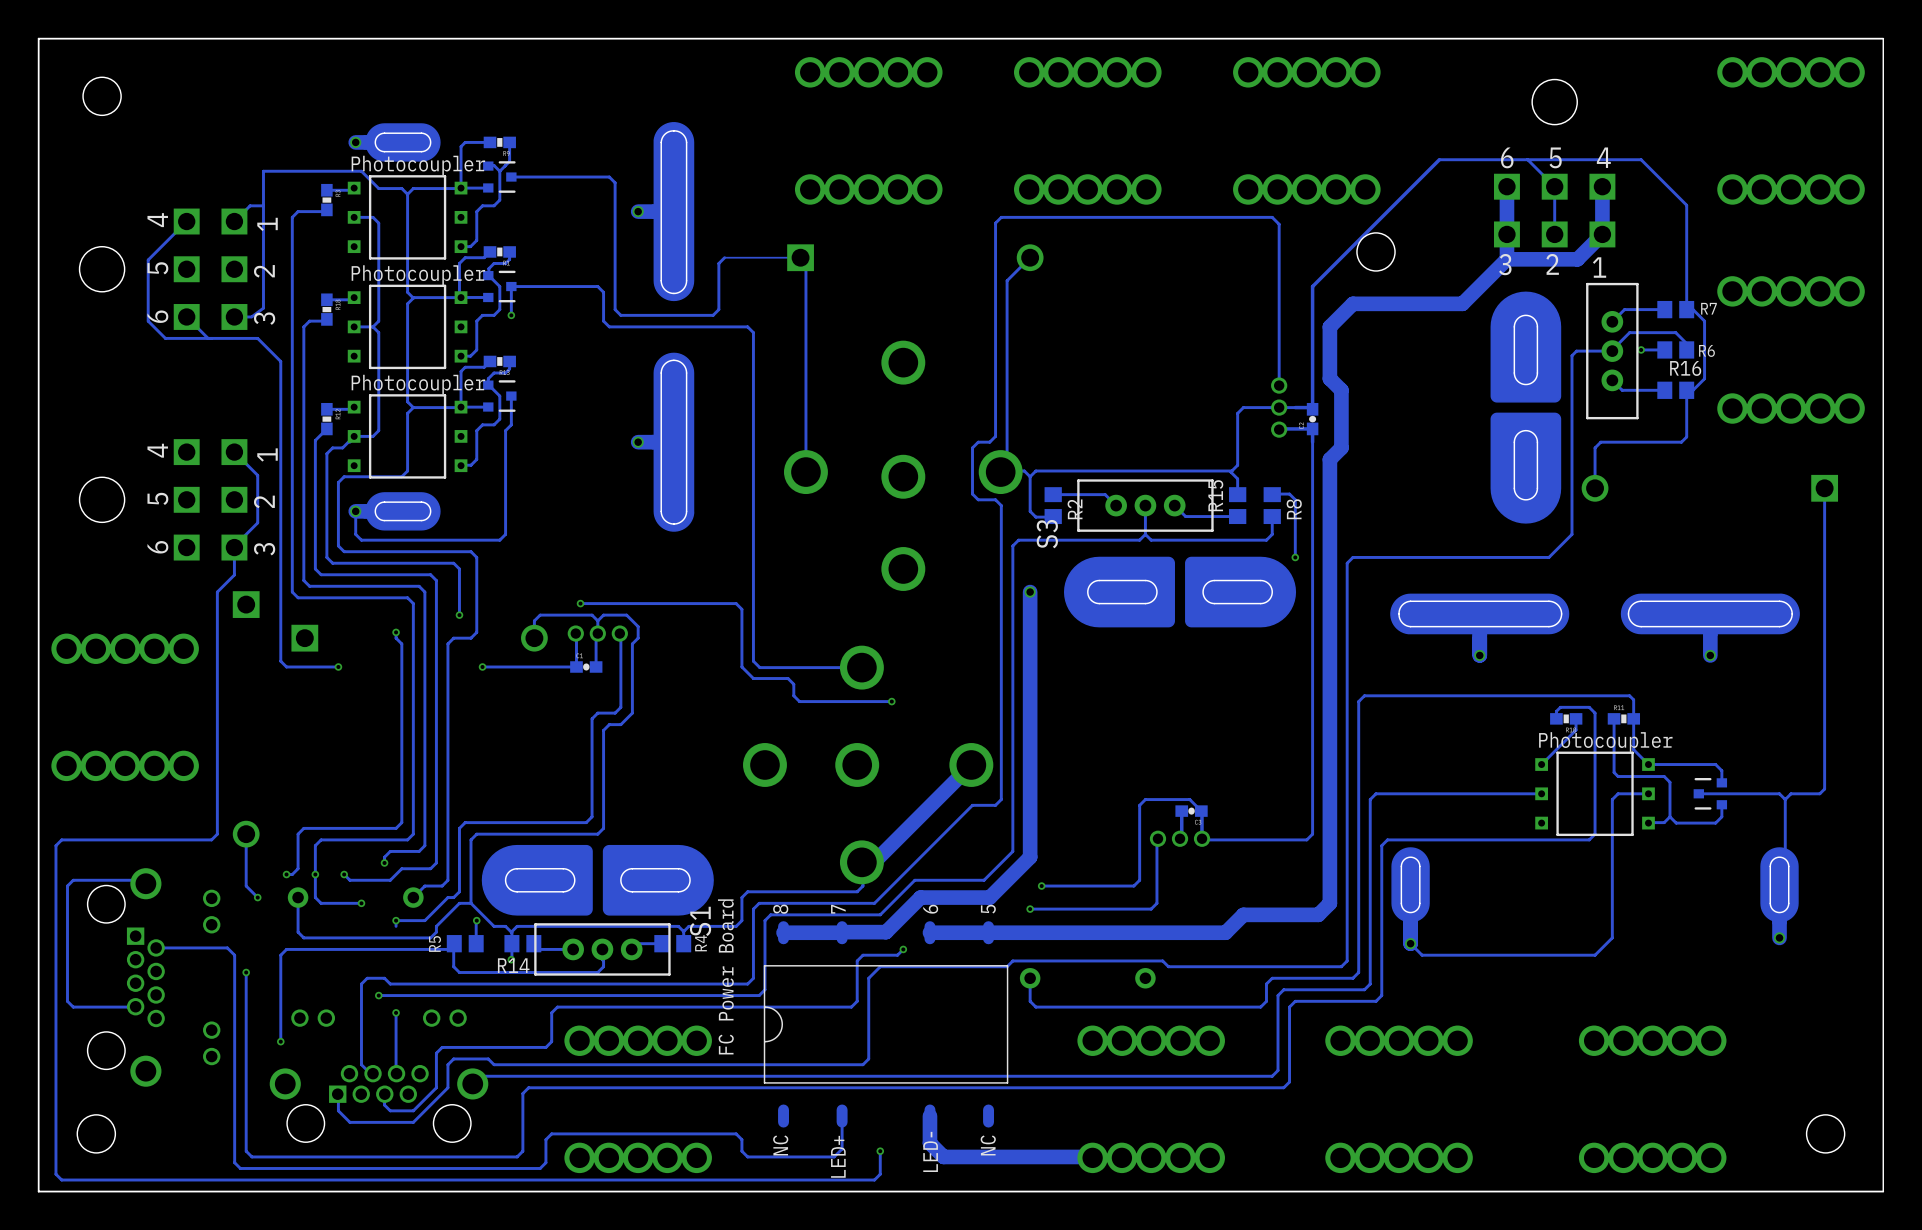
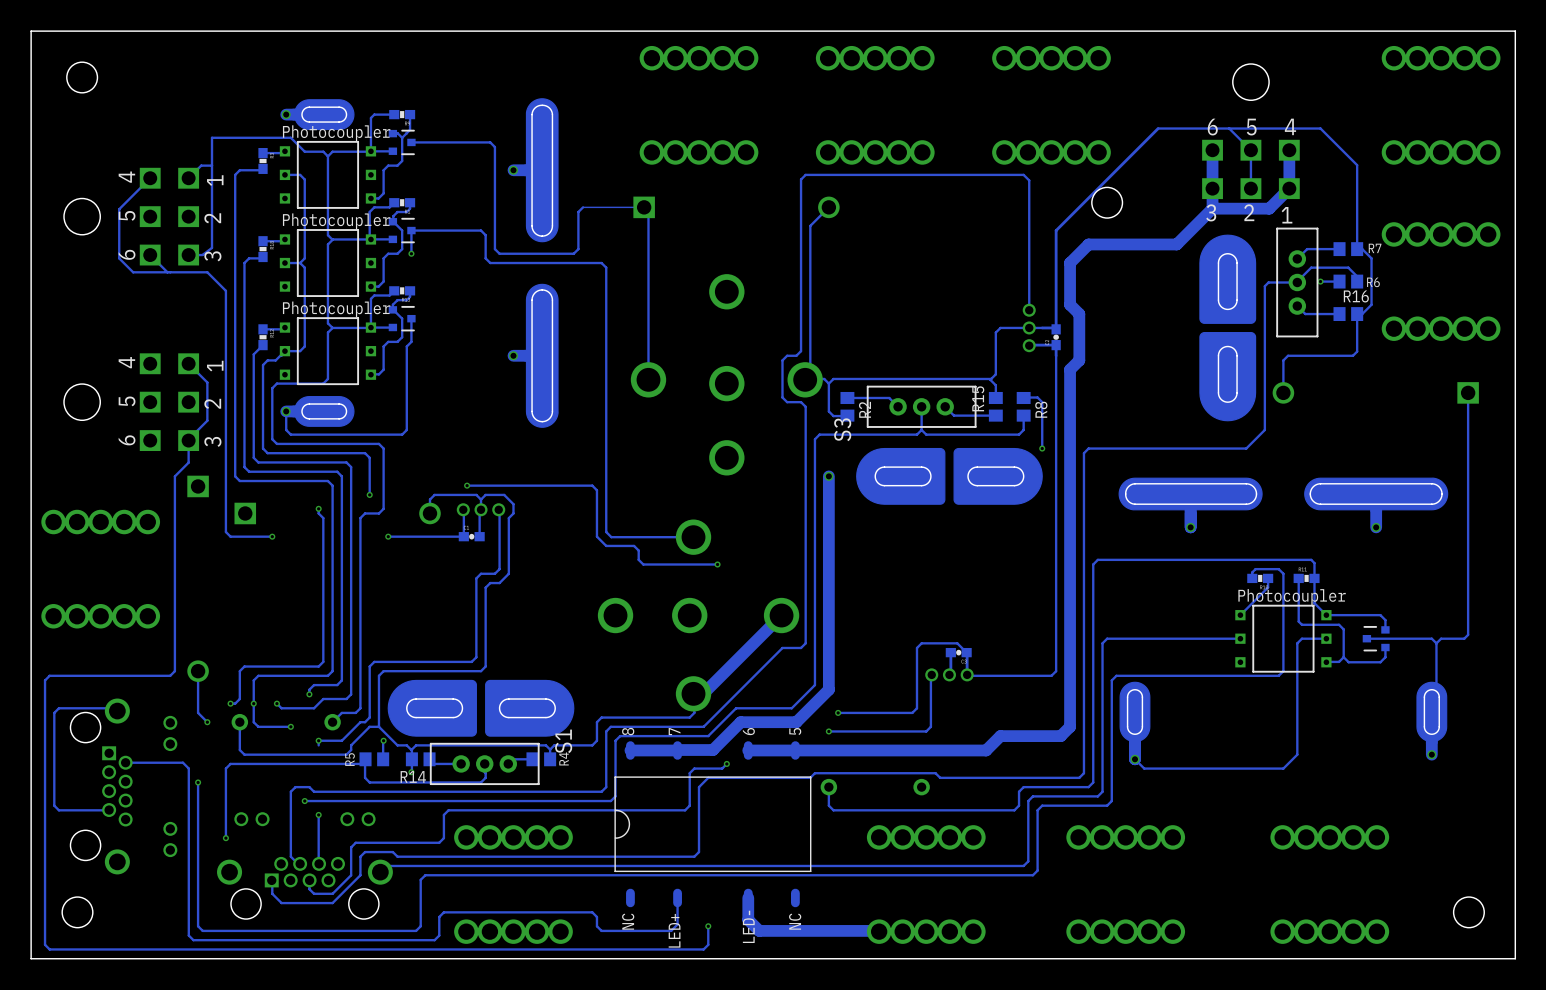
text: FC Power Board (725, 976) -> none

